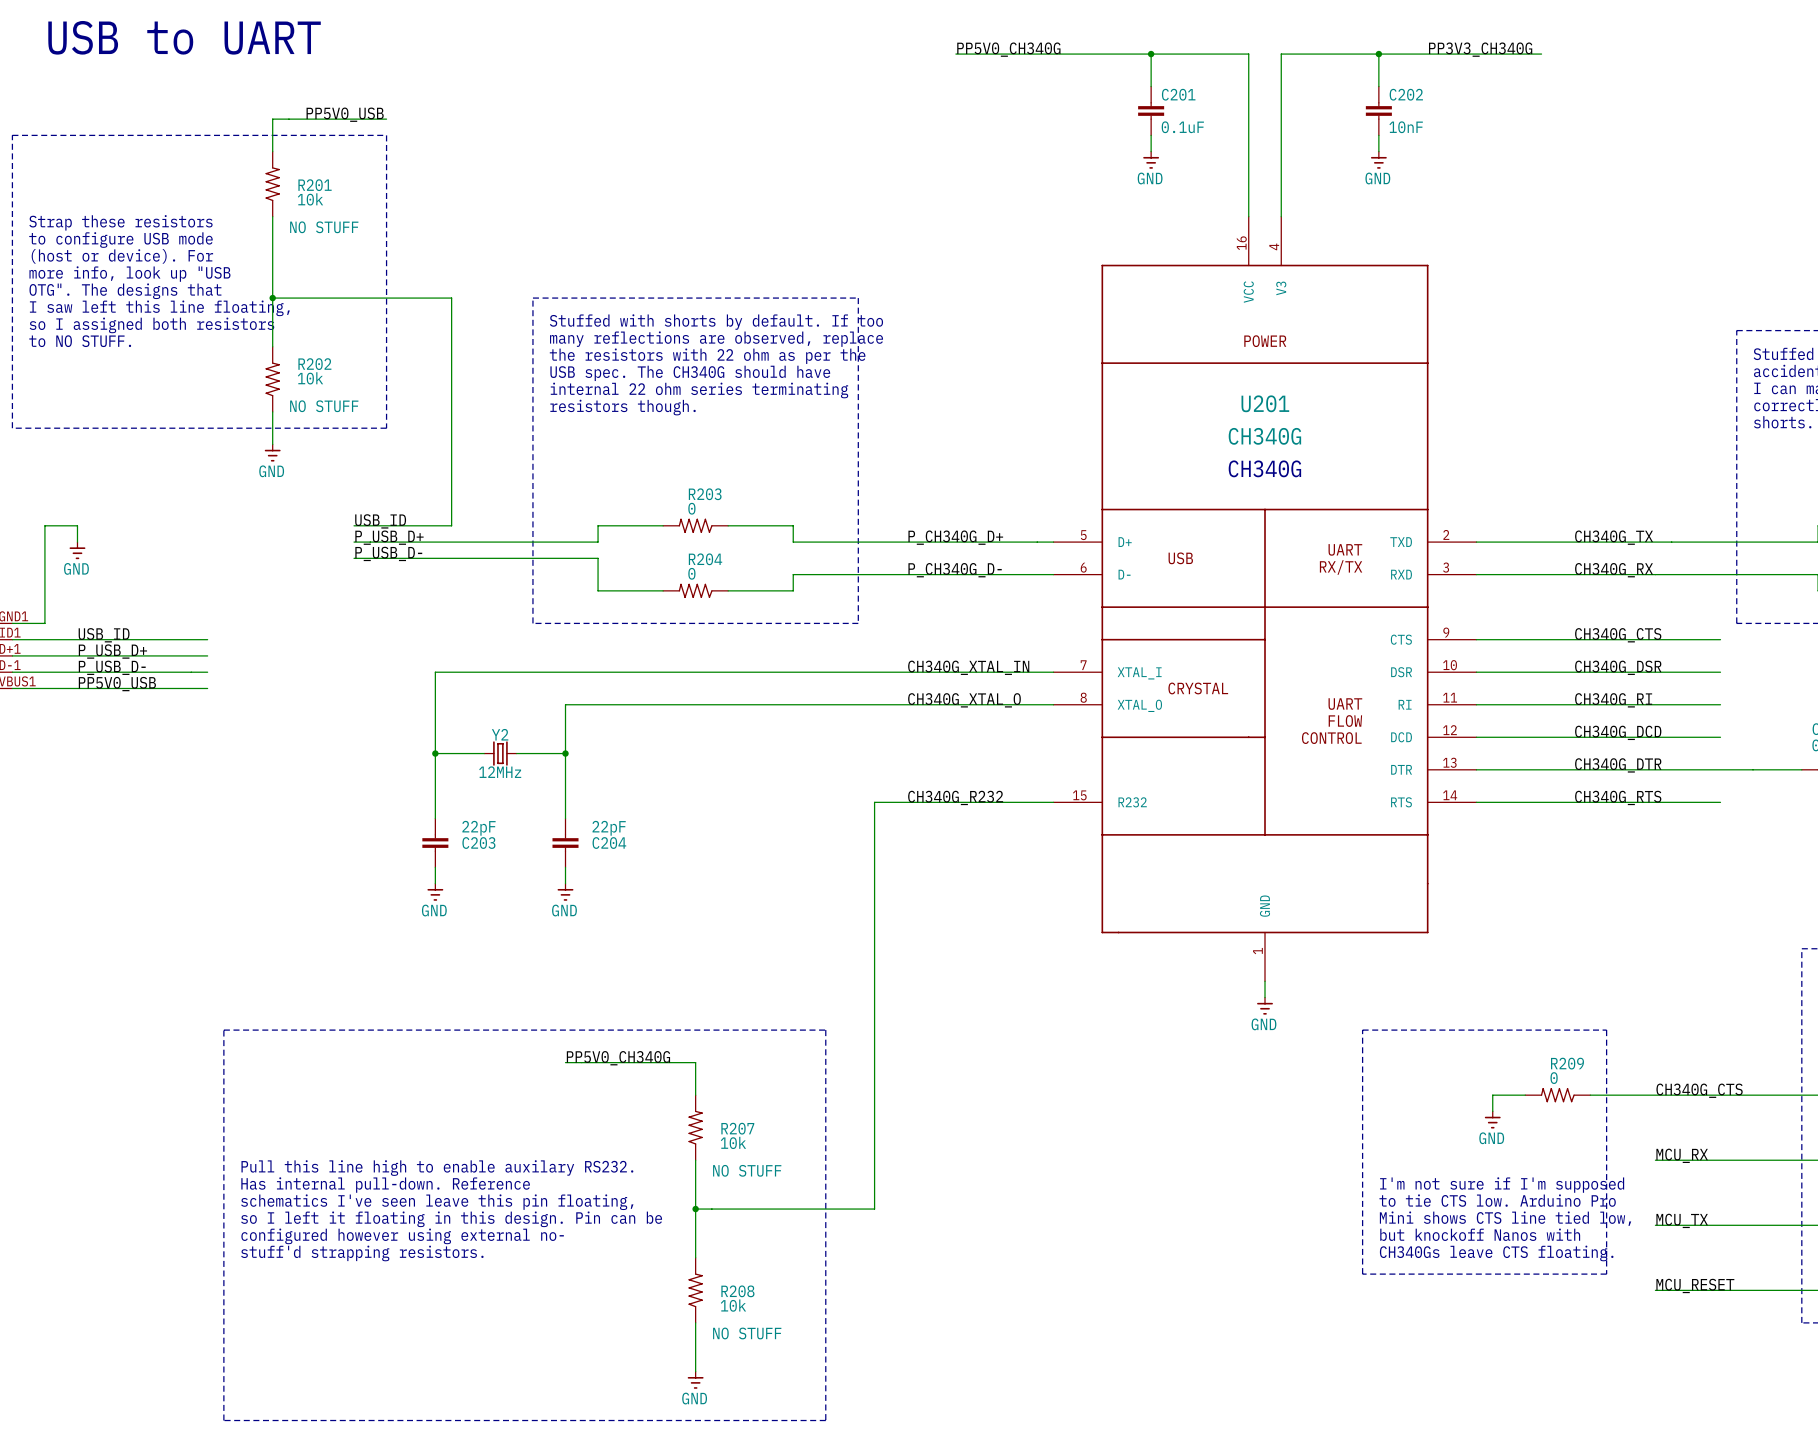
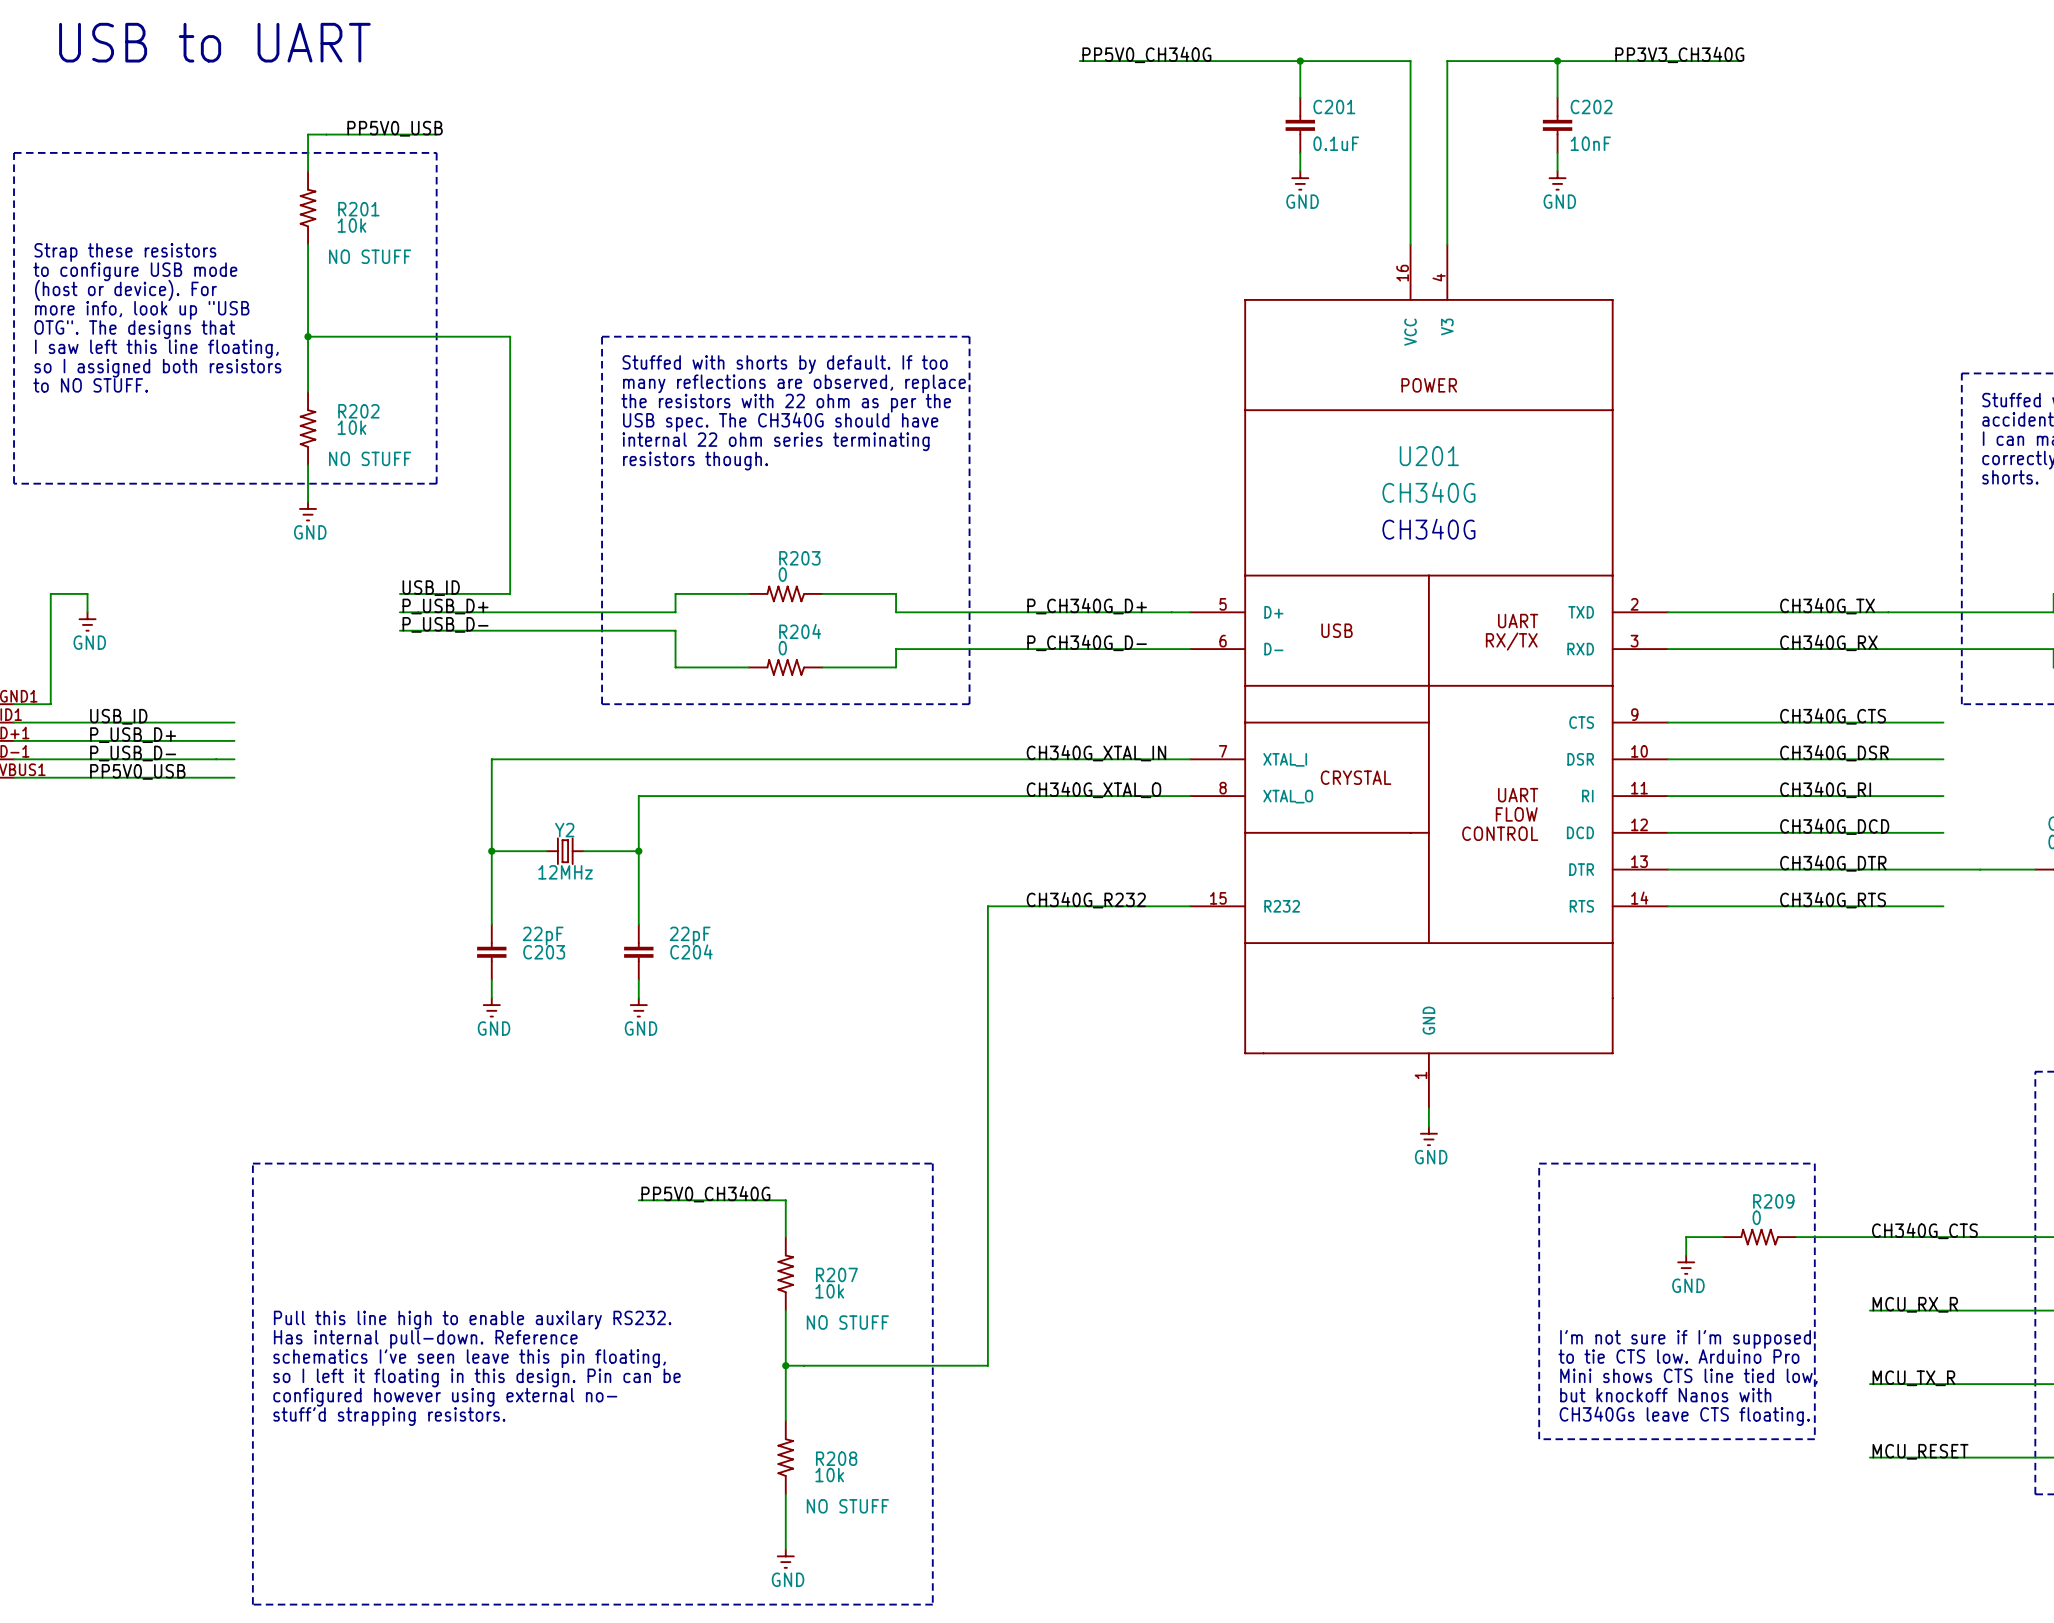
label: MCU_RX (1682, 1155) -> MCU_RX_R (1915, 1304)
label: MCU_TX (1682, 1220) -> MCU_TX_R (1913, 1378)

